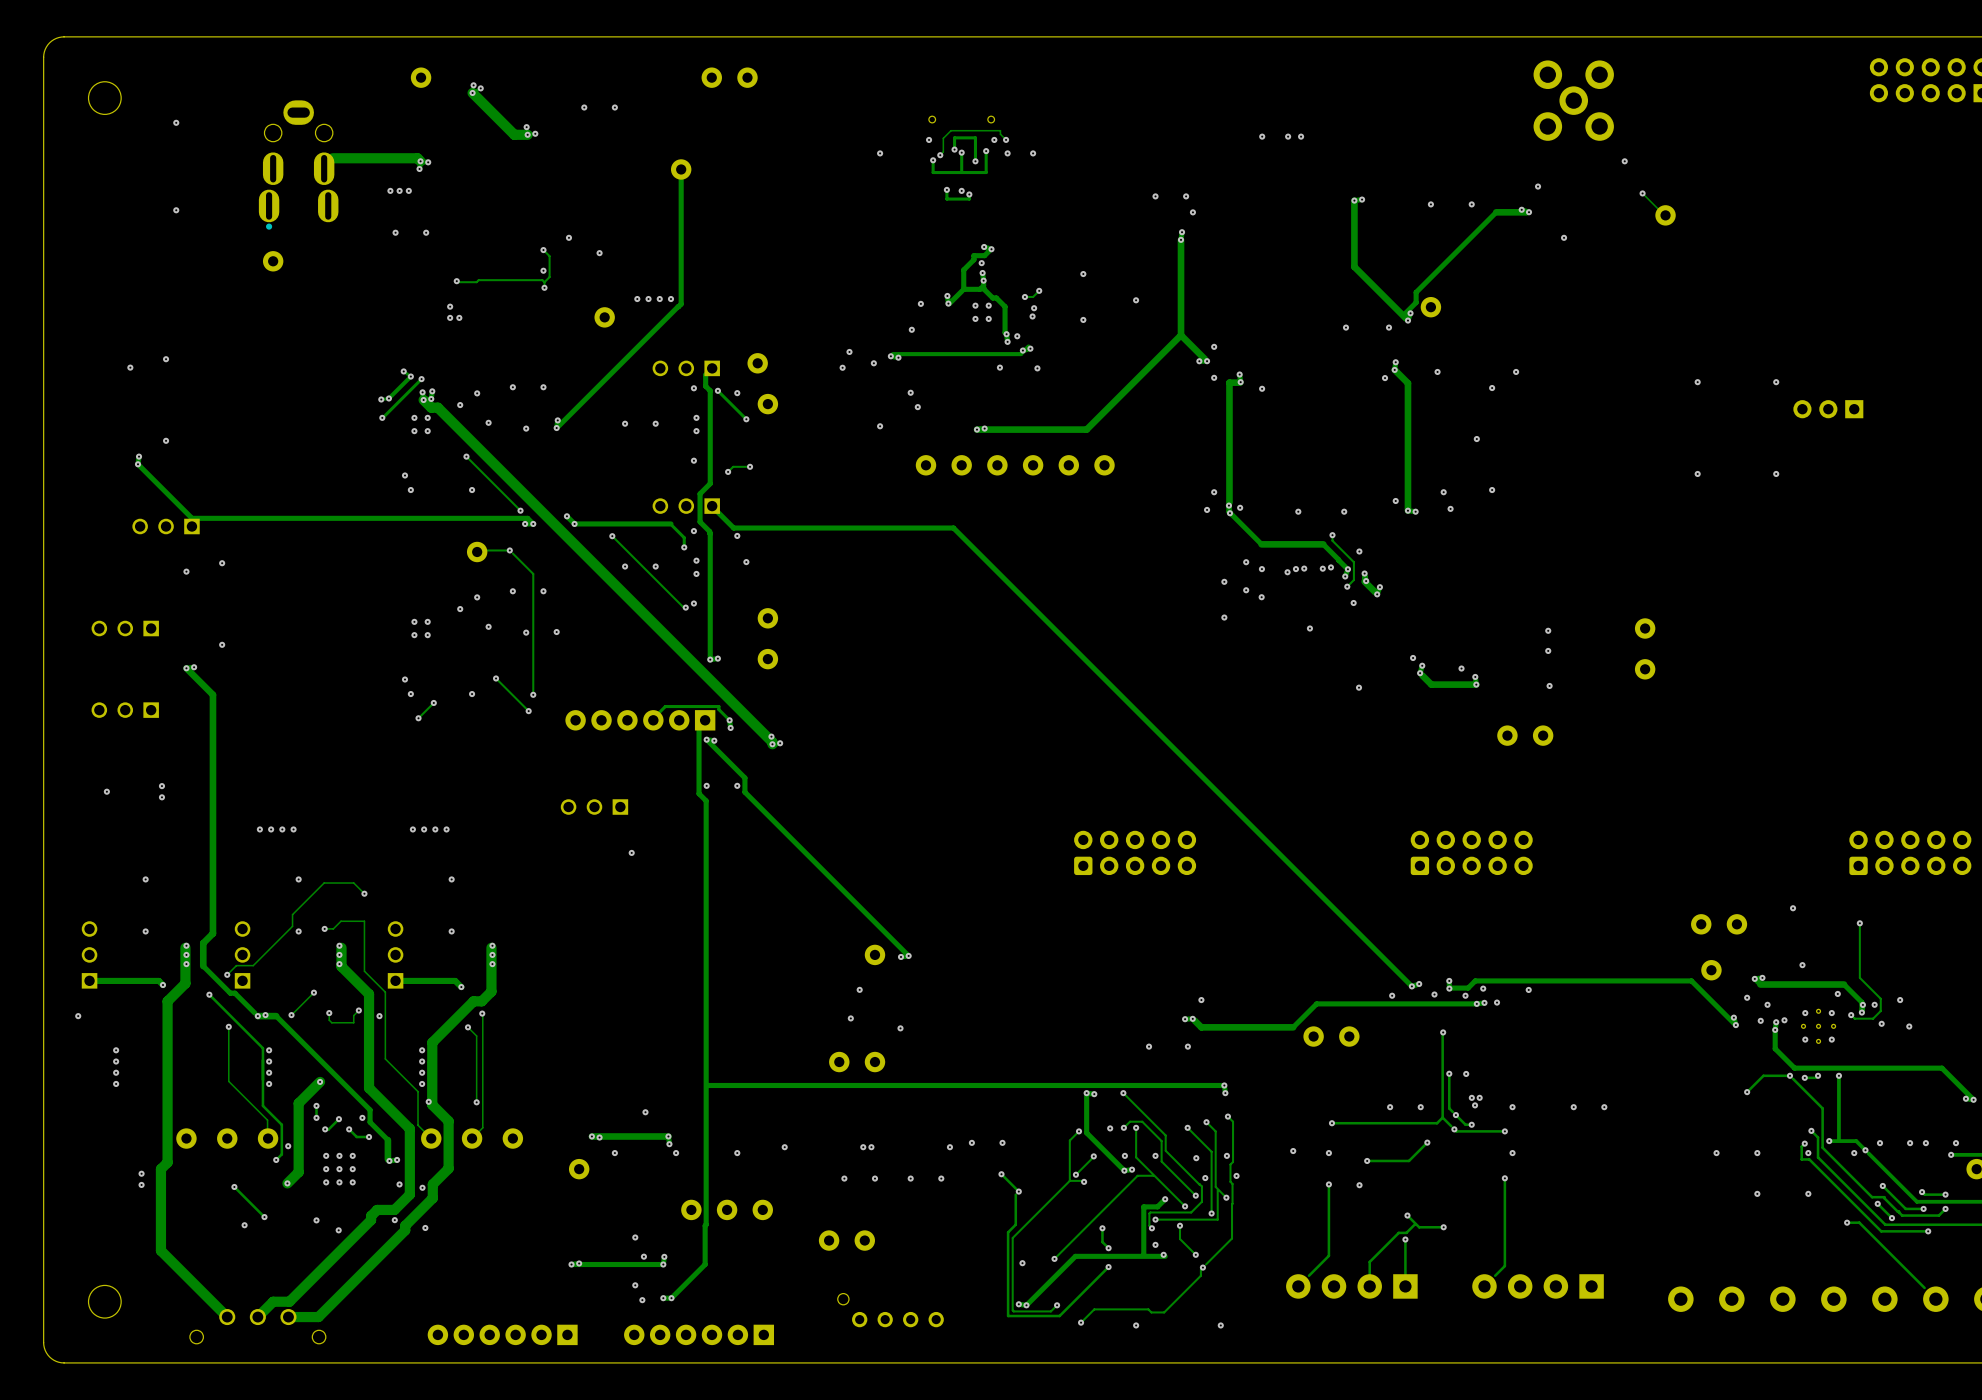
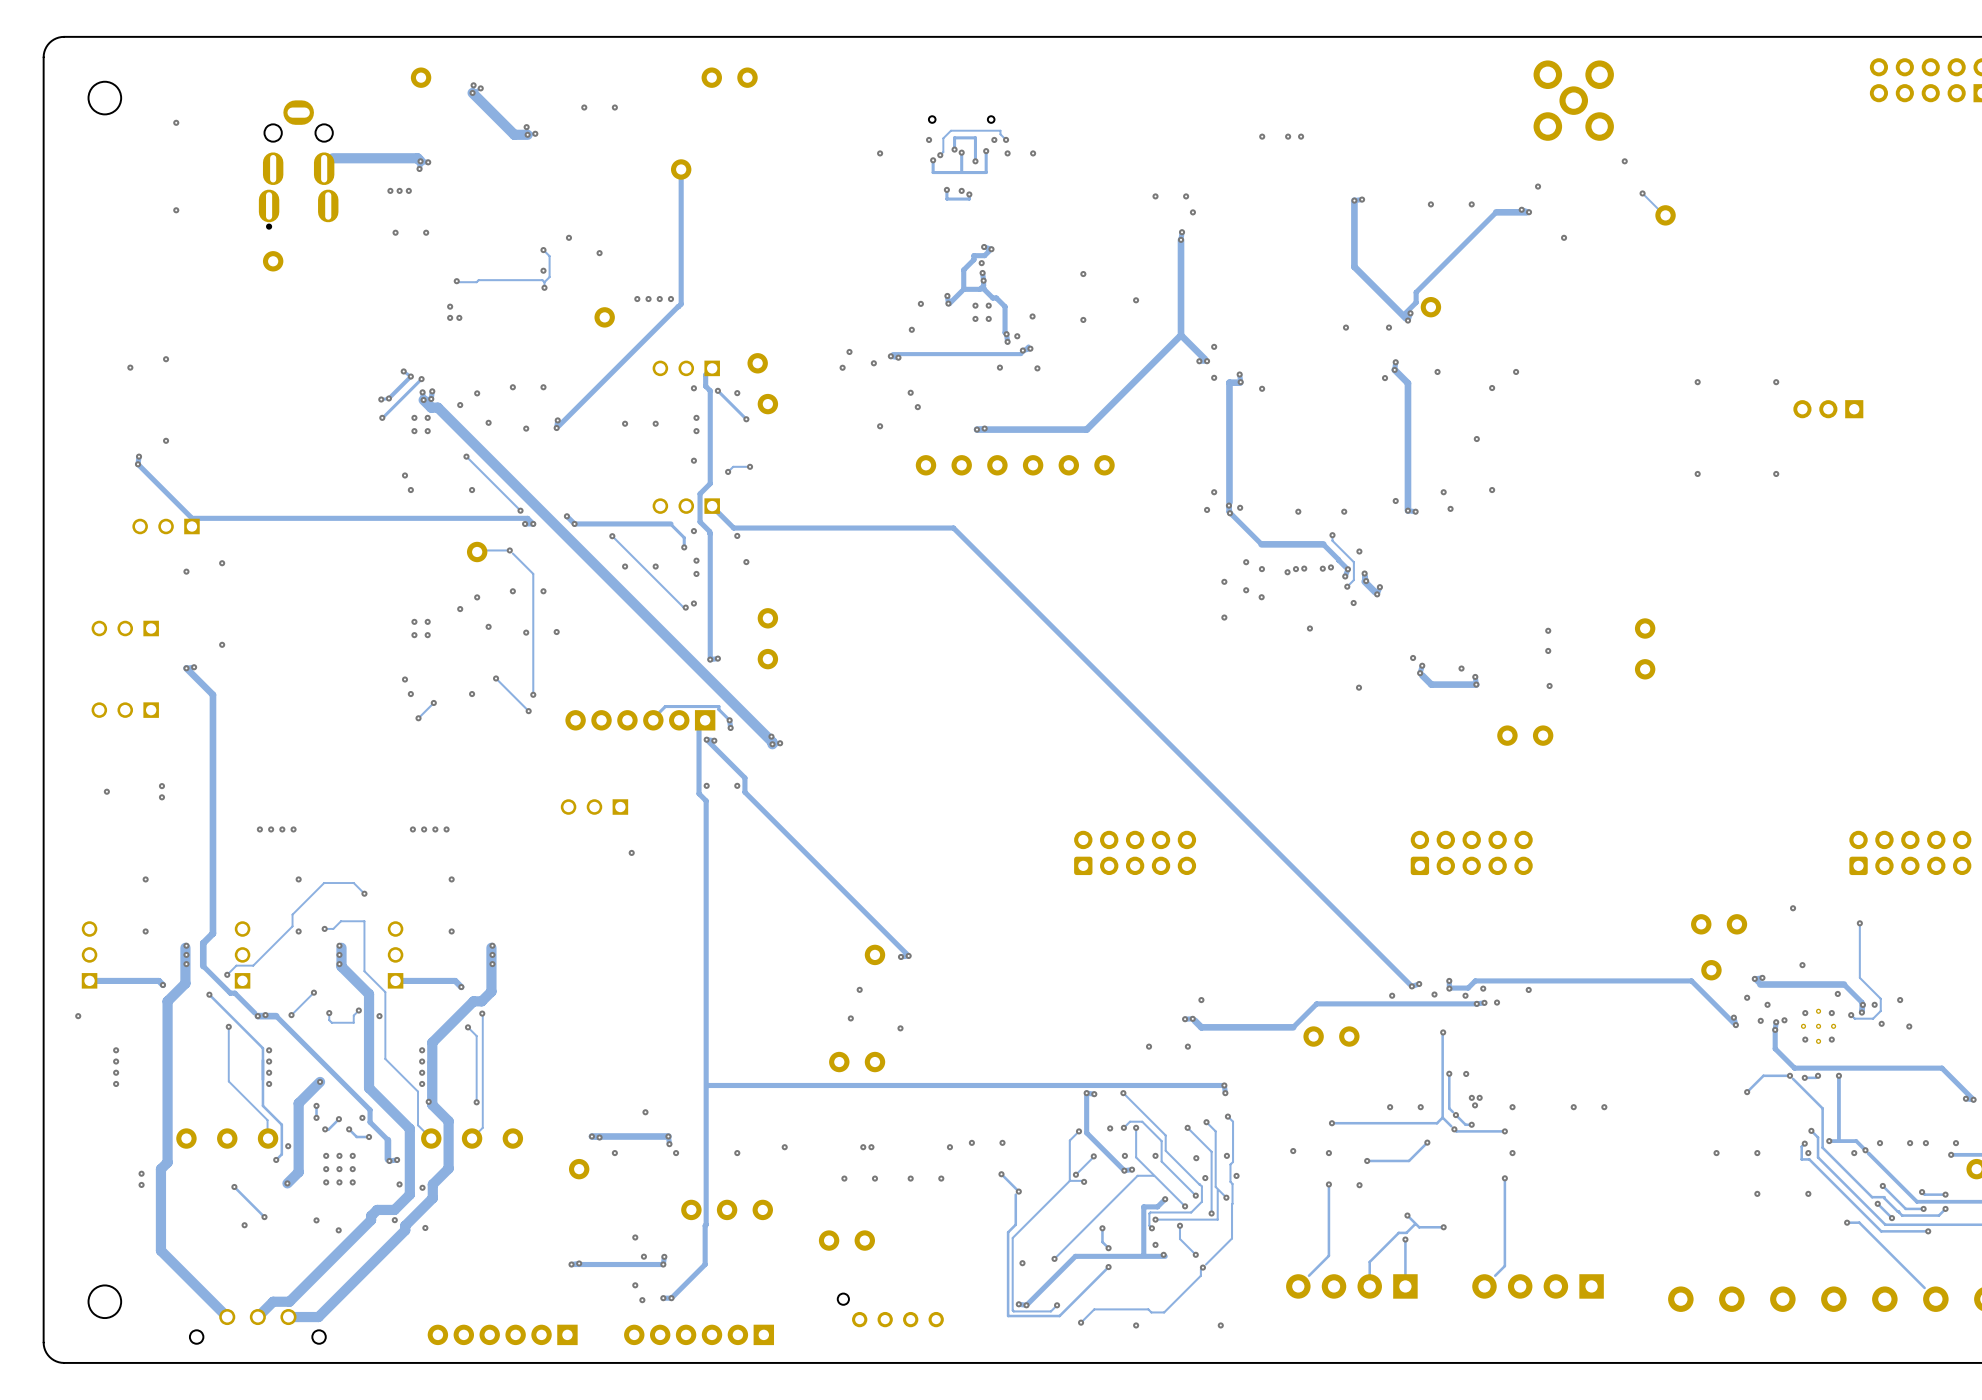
track: (1039, 290) (1033, 296) (1024, 296) -> none
via: (1039, 290) -> none
via: (1024, 296) -> none
via: (1034, 308) -> none

